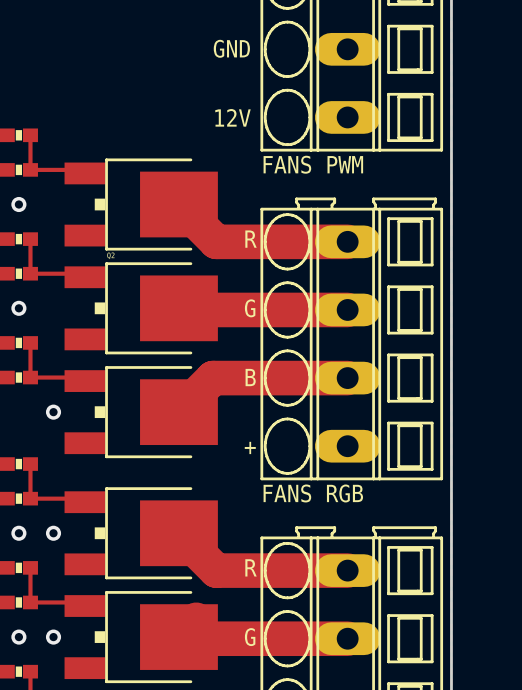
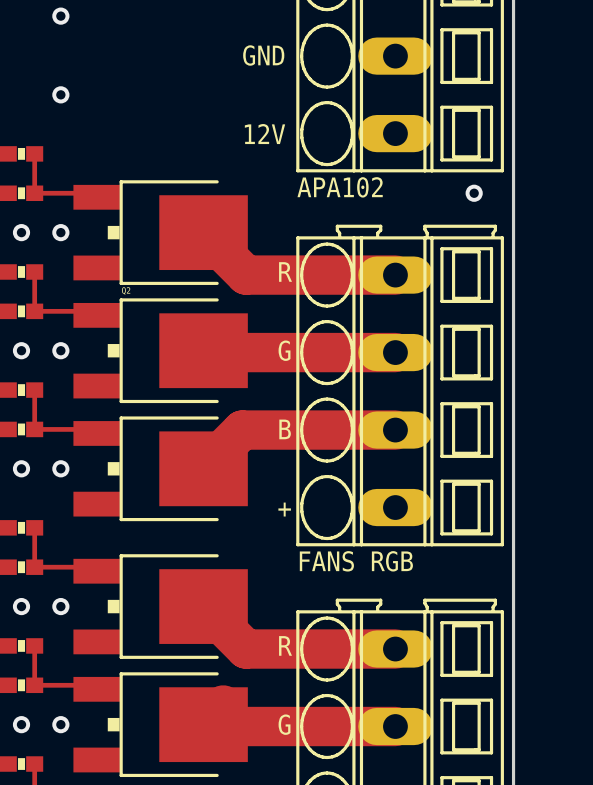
via: none -> (60, 16)
via: none -> (60, 94)
text: FANS PWM (313, 164) -> APA102 (340, 187)
via: none -> (474, 193)
via: none -> (60, 232)
via: none -> (60, 350)
via: none -> (21, 468)

